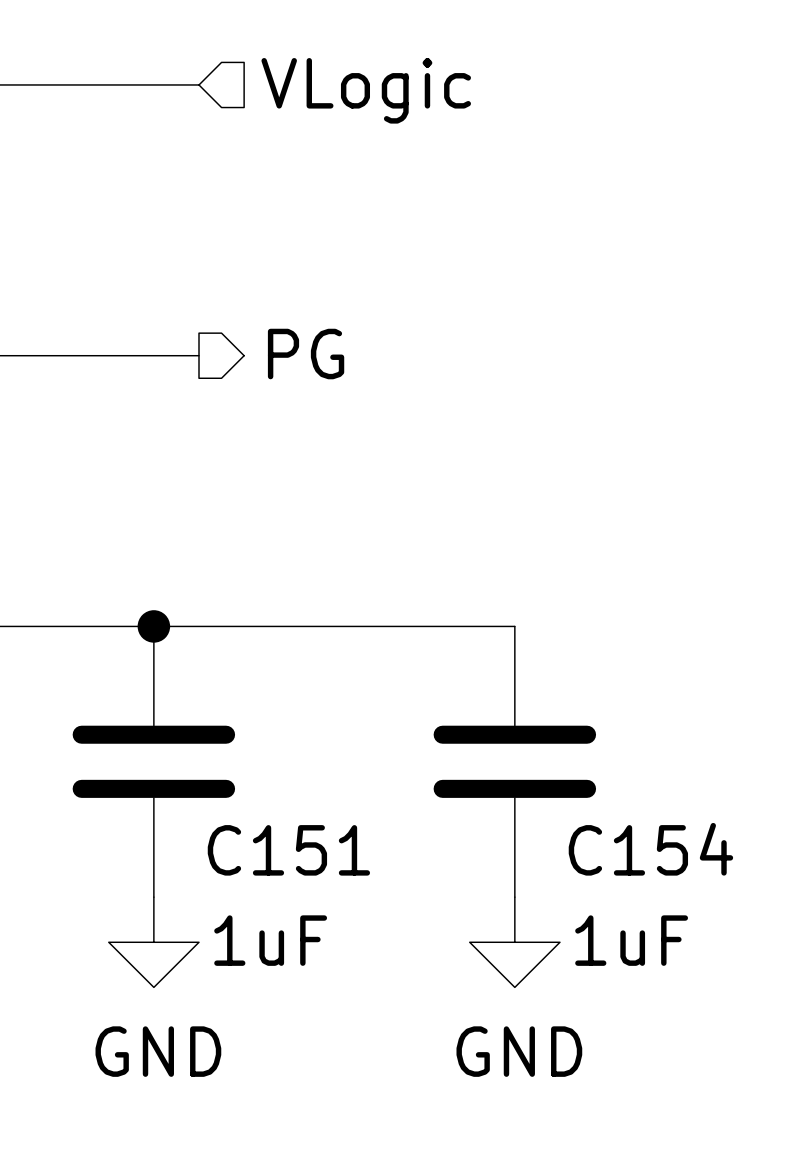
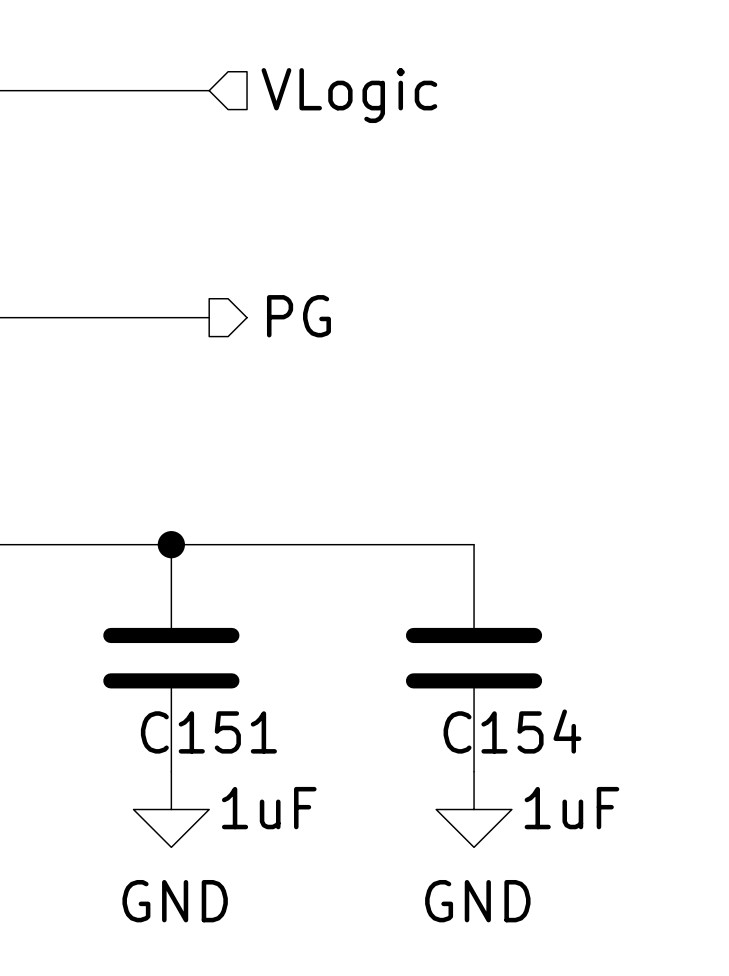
C154 name position: C154 (650, 849) -> C154 (512, 731)
C151 name position: C151 (288, 850) -> C151 (208, 732)

